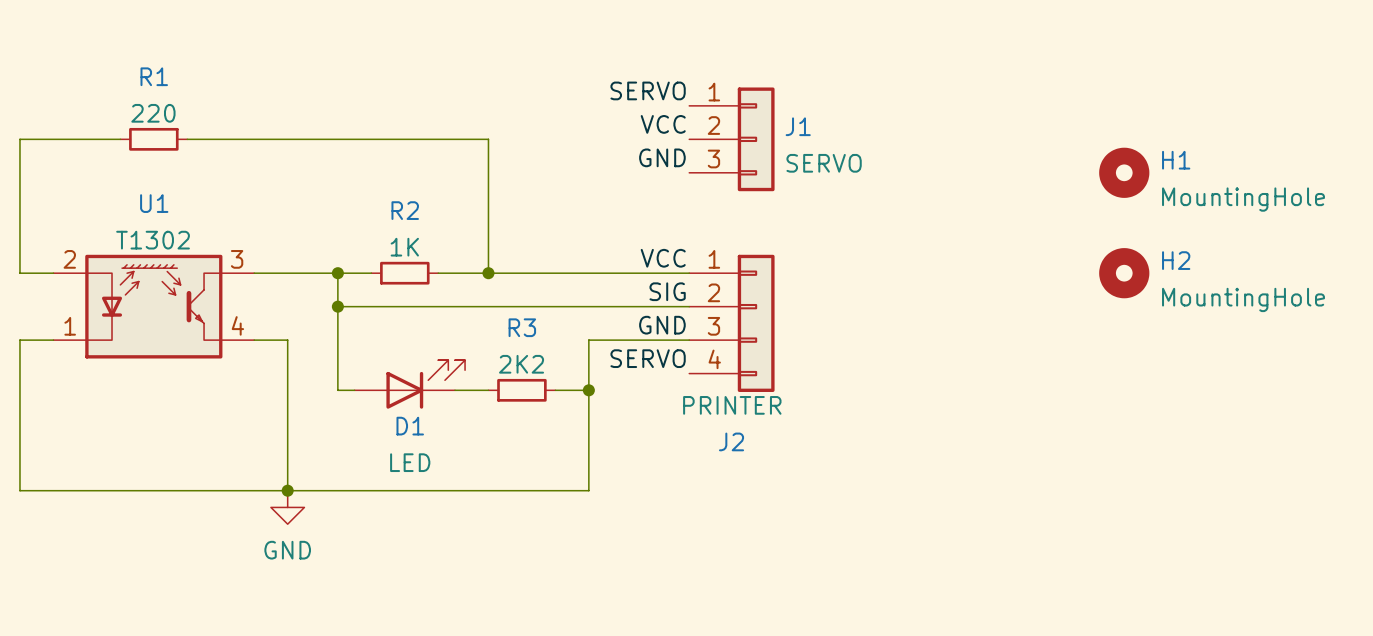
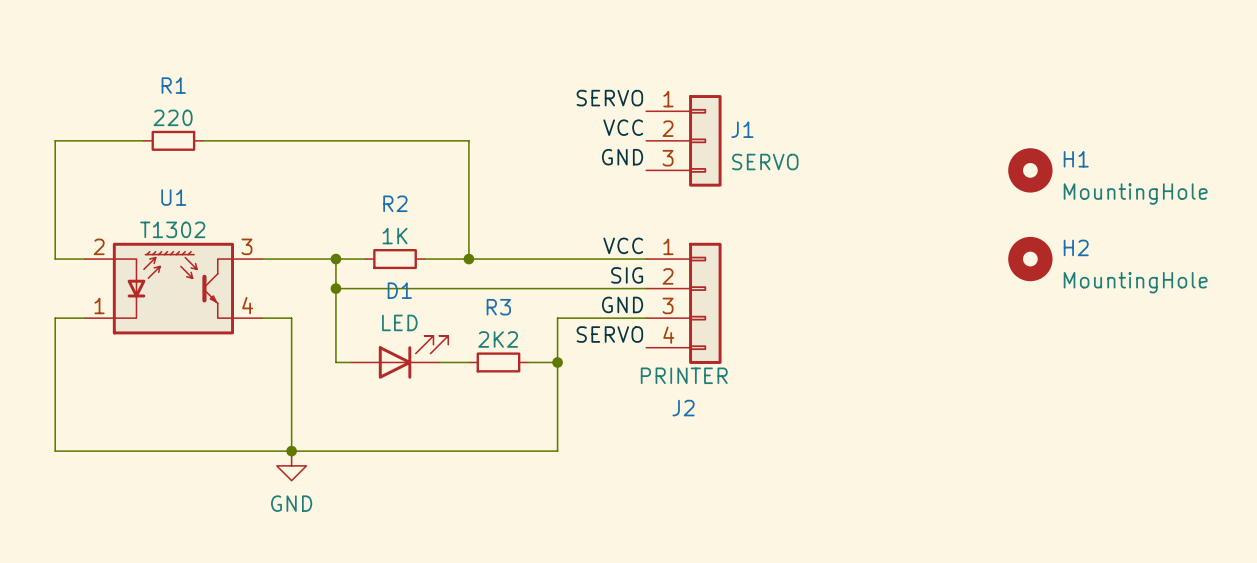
D1 name position: D1 (410, 426) -> D1 (399, 290)
D1 value position: LED (410, 462) -> LED (399, 322)

